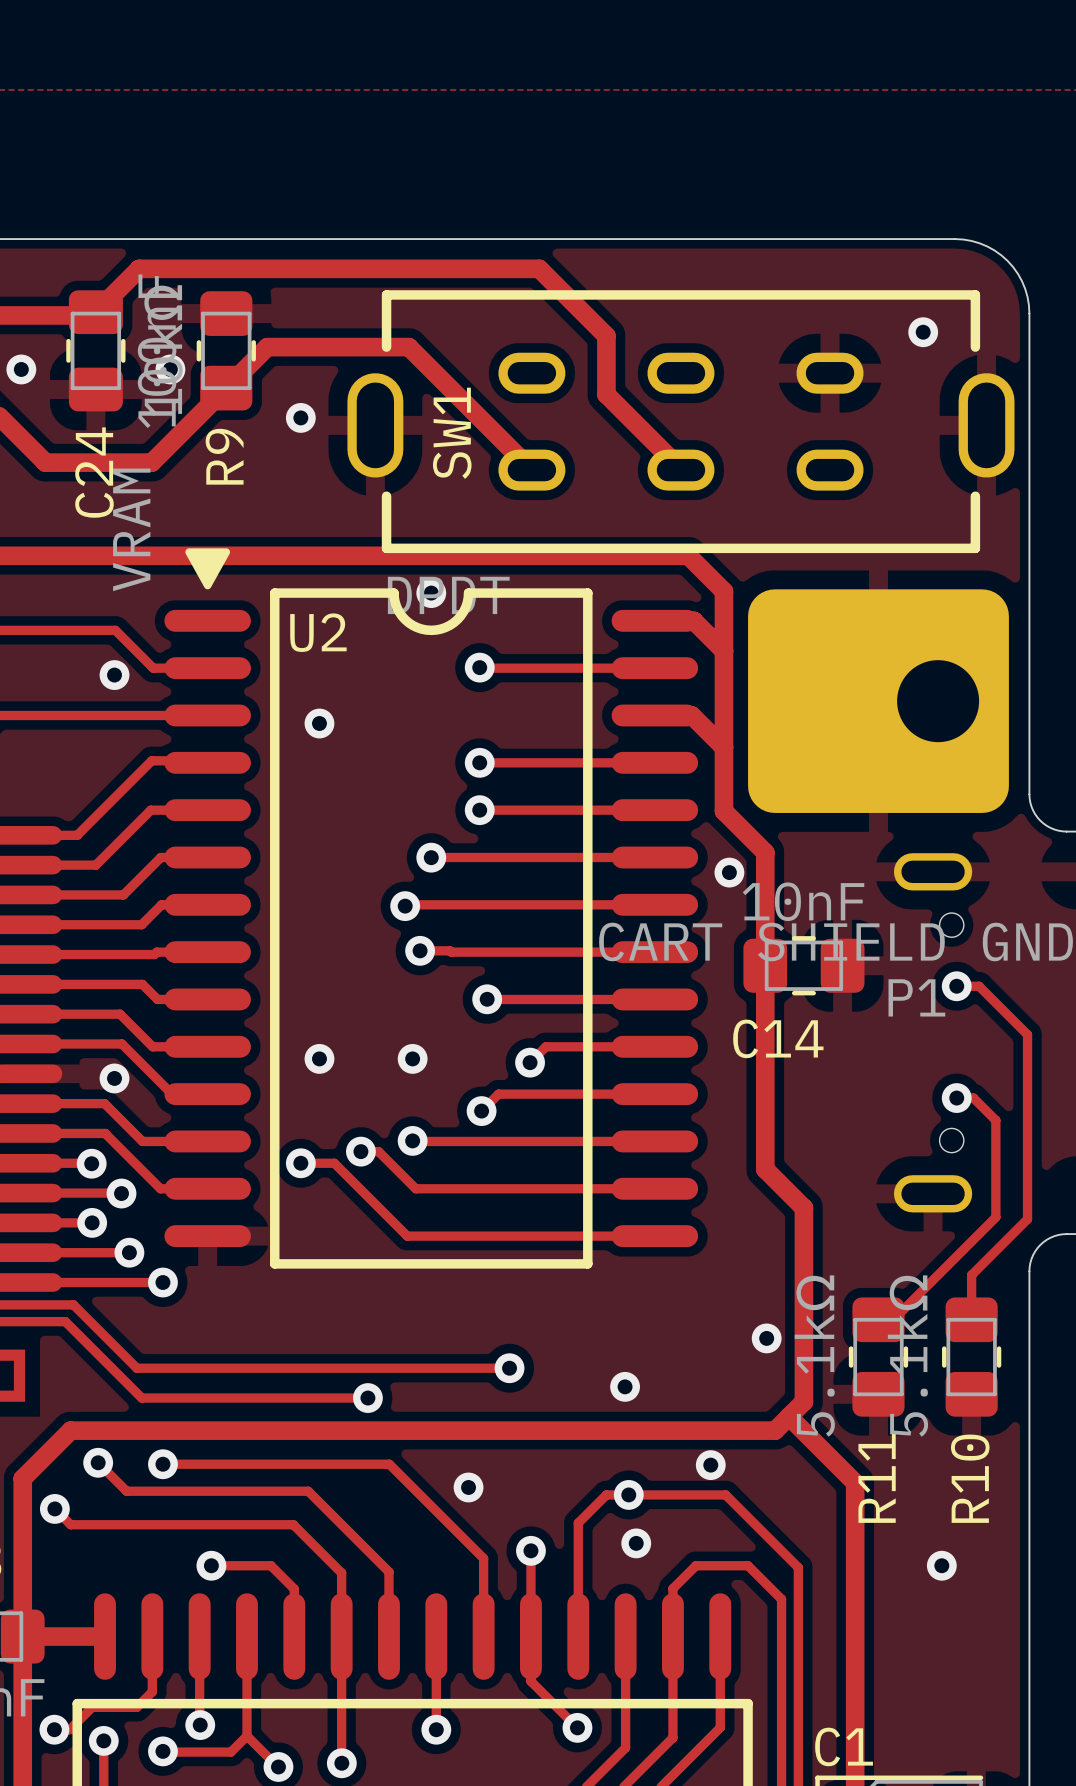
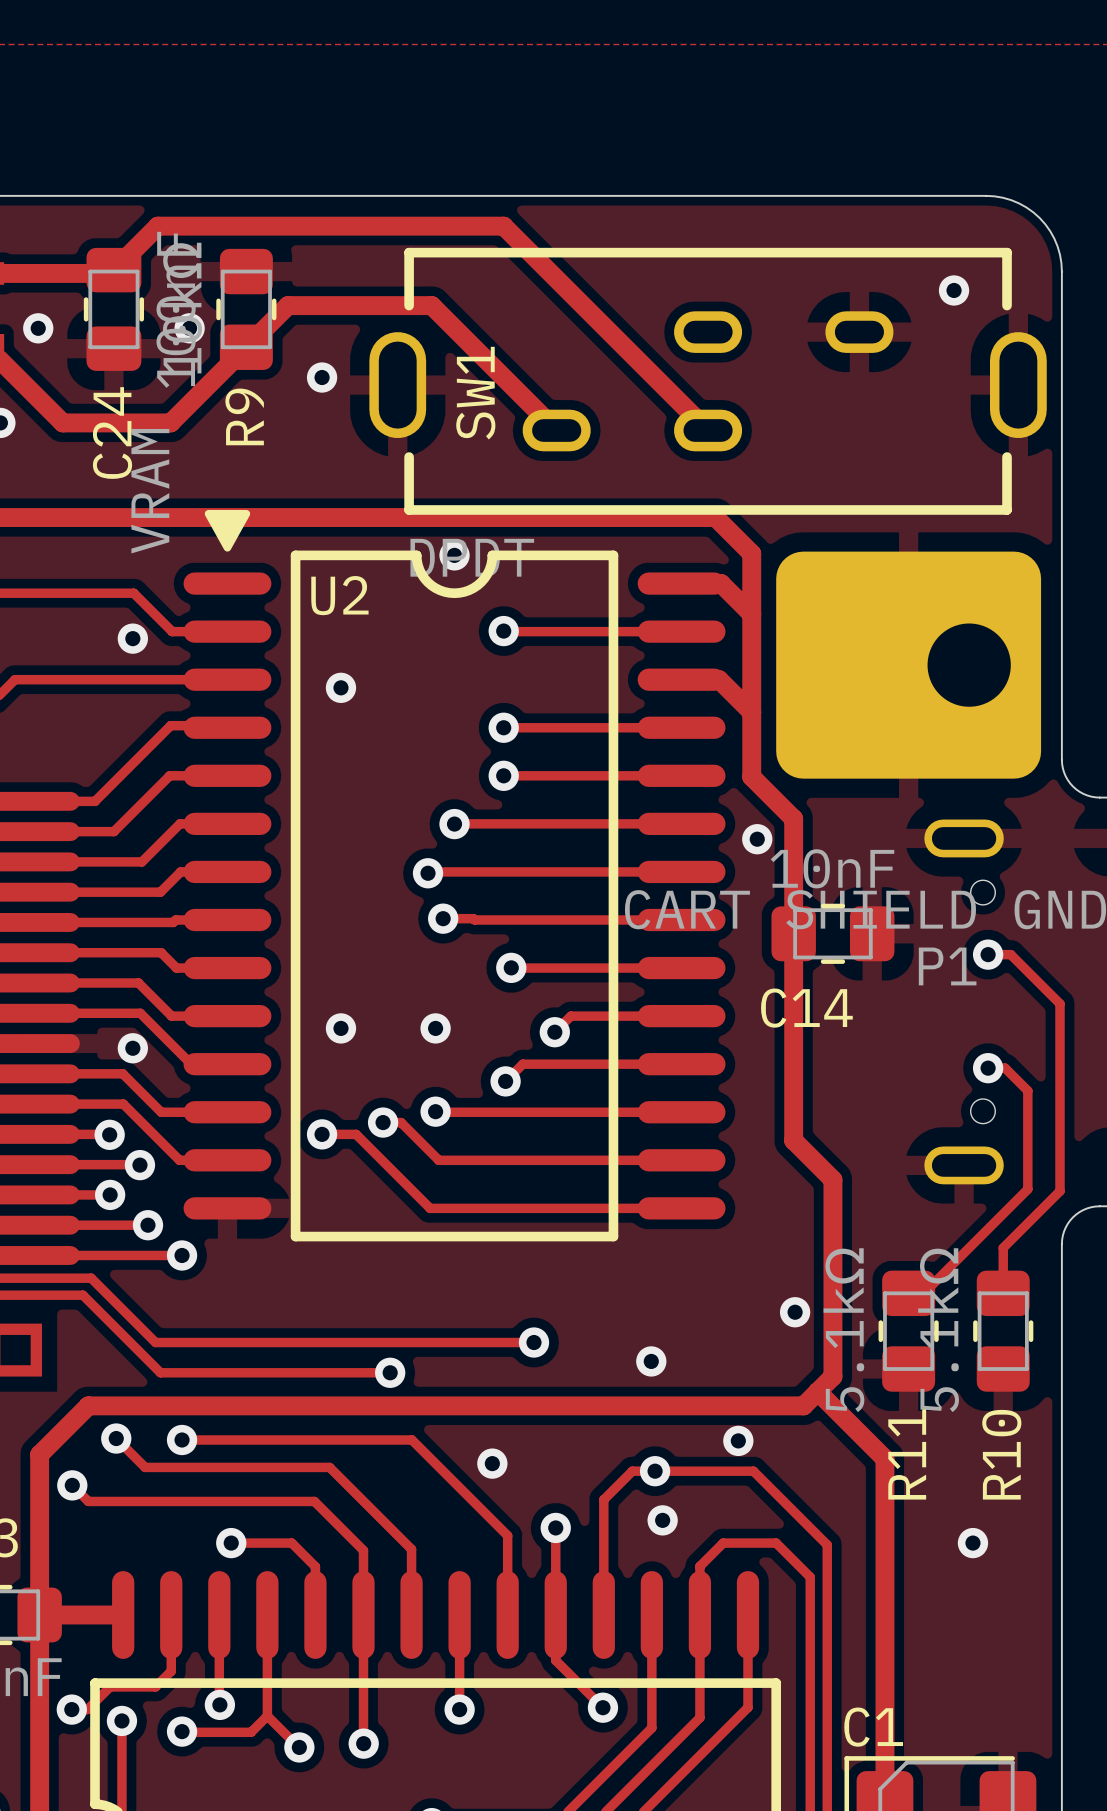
track: (479, 268) (539, 268) (606, 335) (606, 394) (679, 467) -> (503, 226) (706, 428)
SW1 footprint: [347, 290, 1015, 554] -> [369, 247, 1047, 515]

